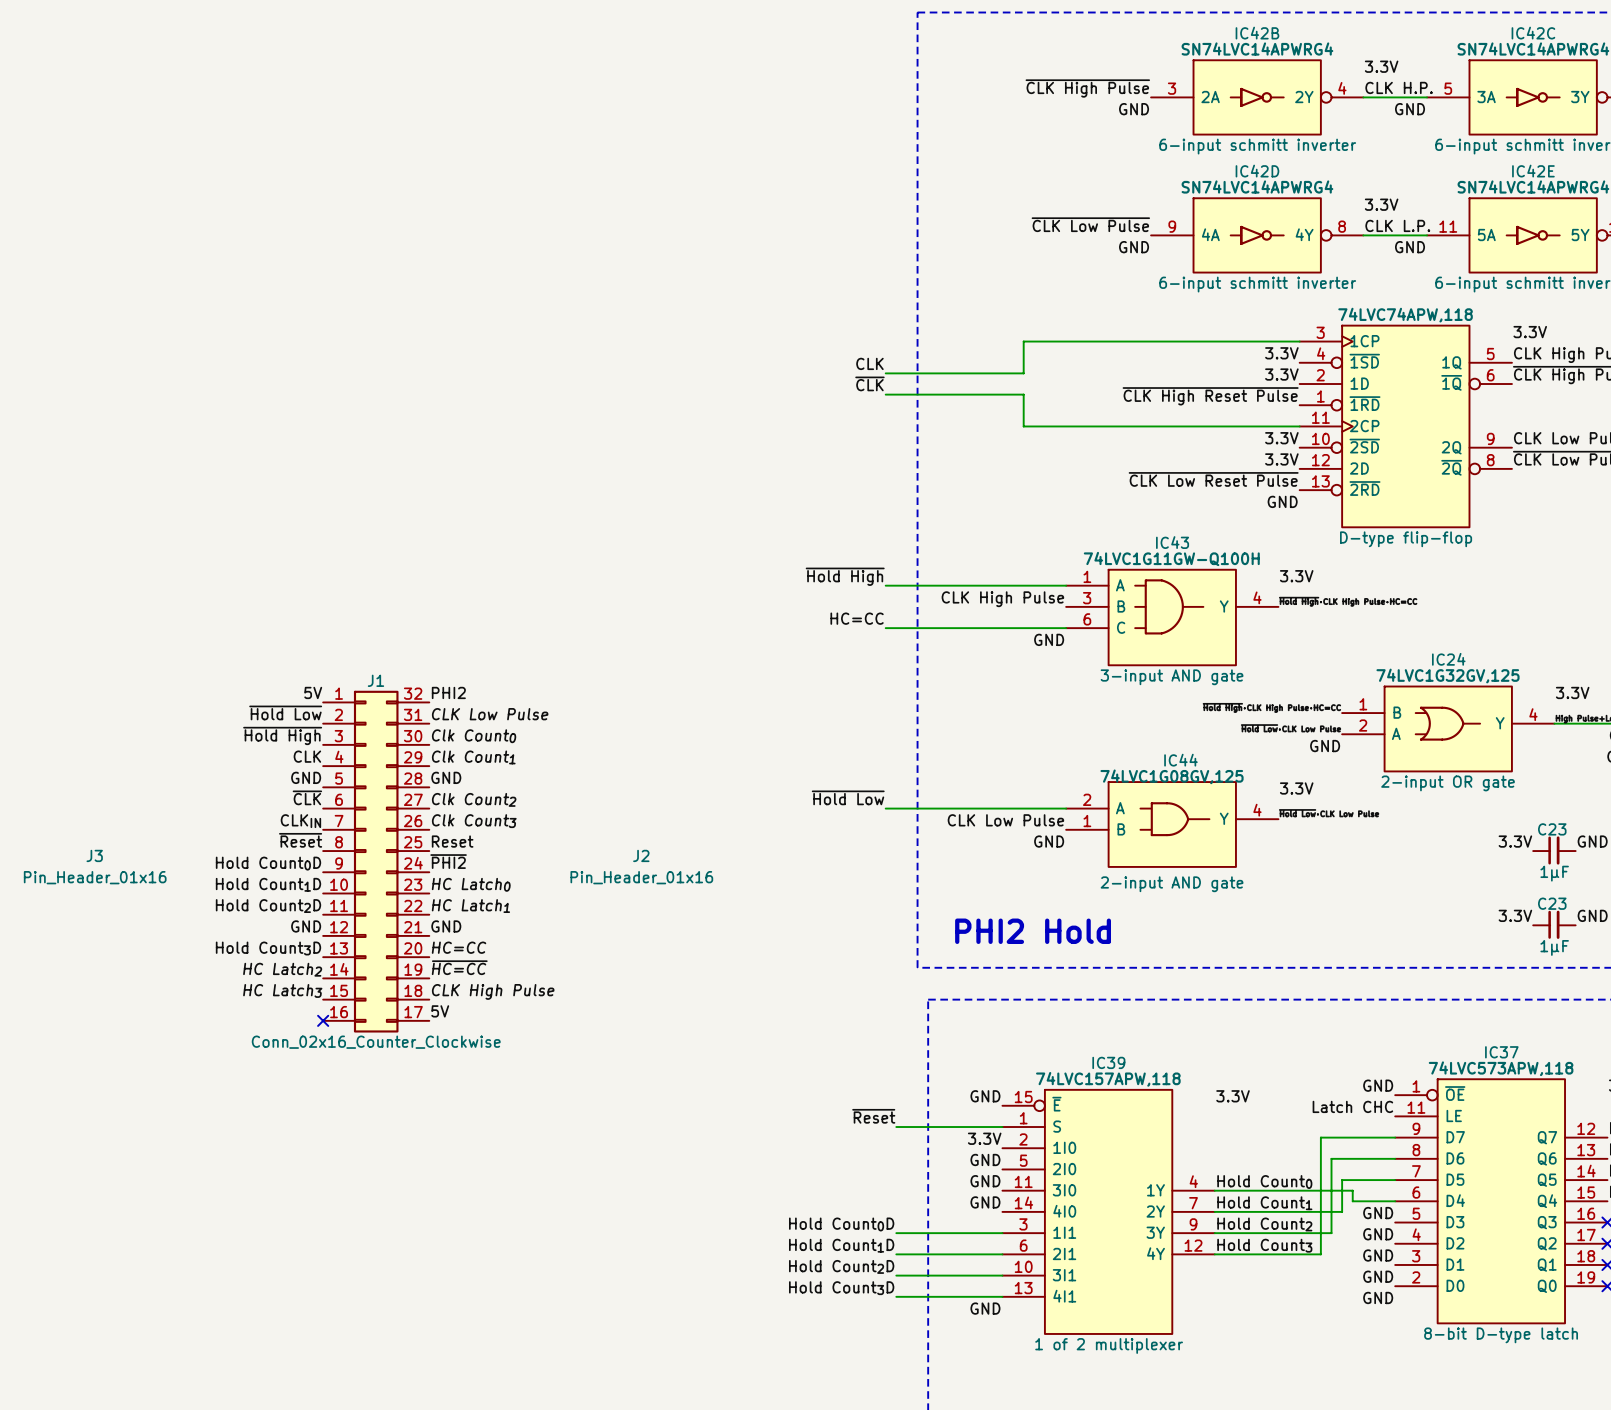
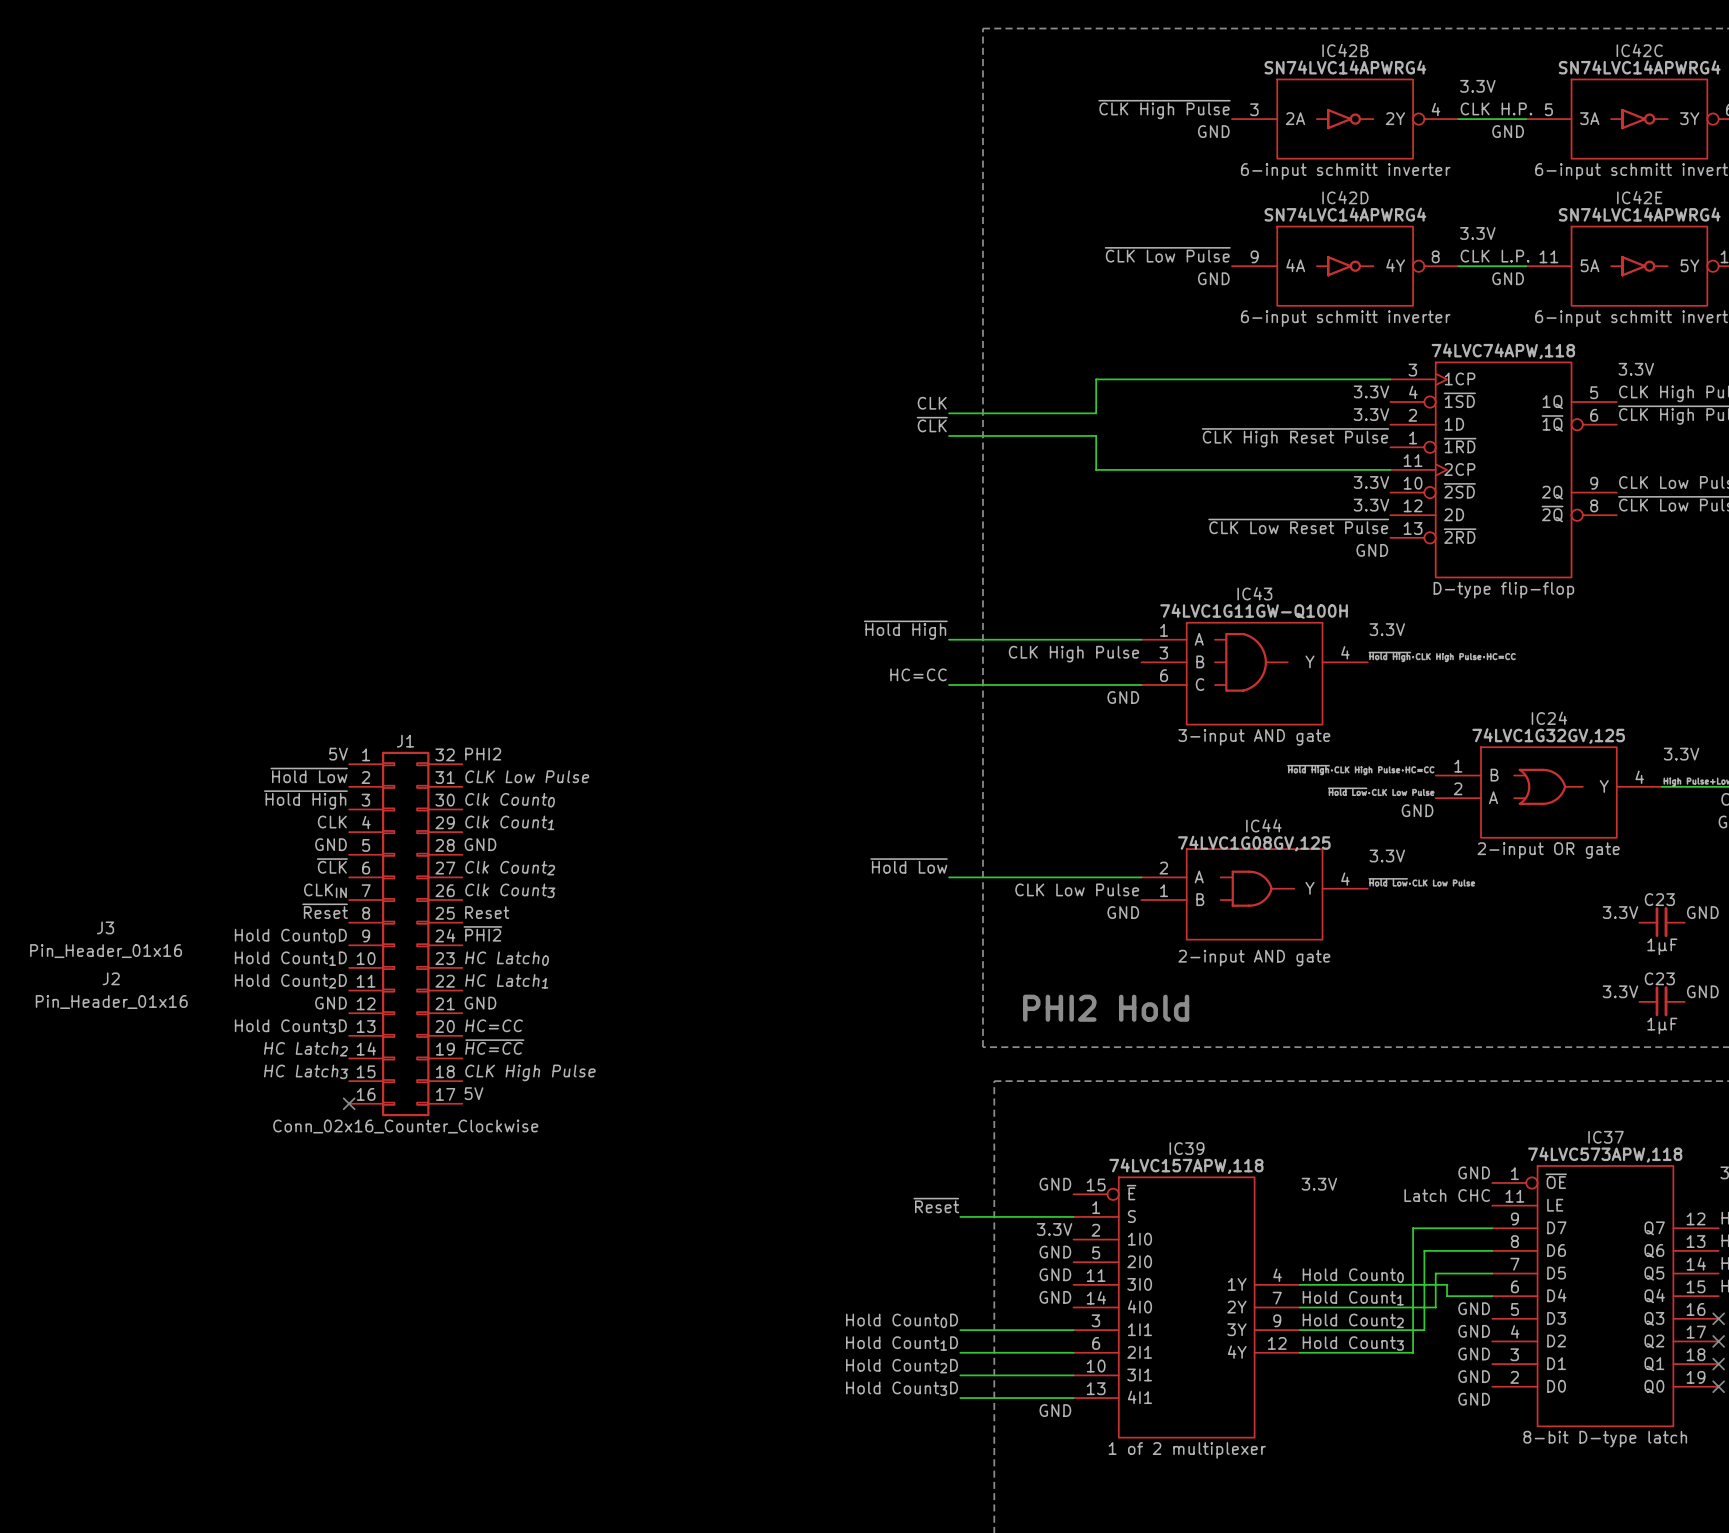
J2 position: (641, 867) -> (111, 990)

